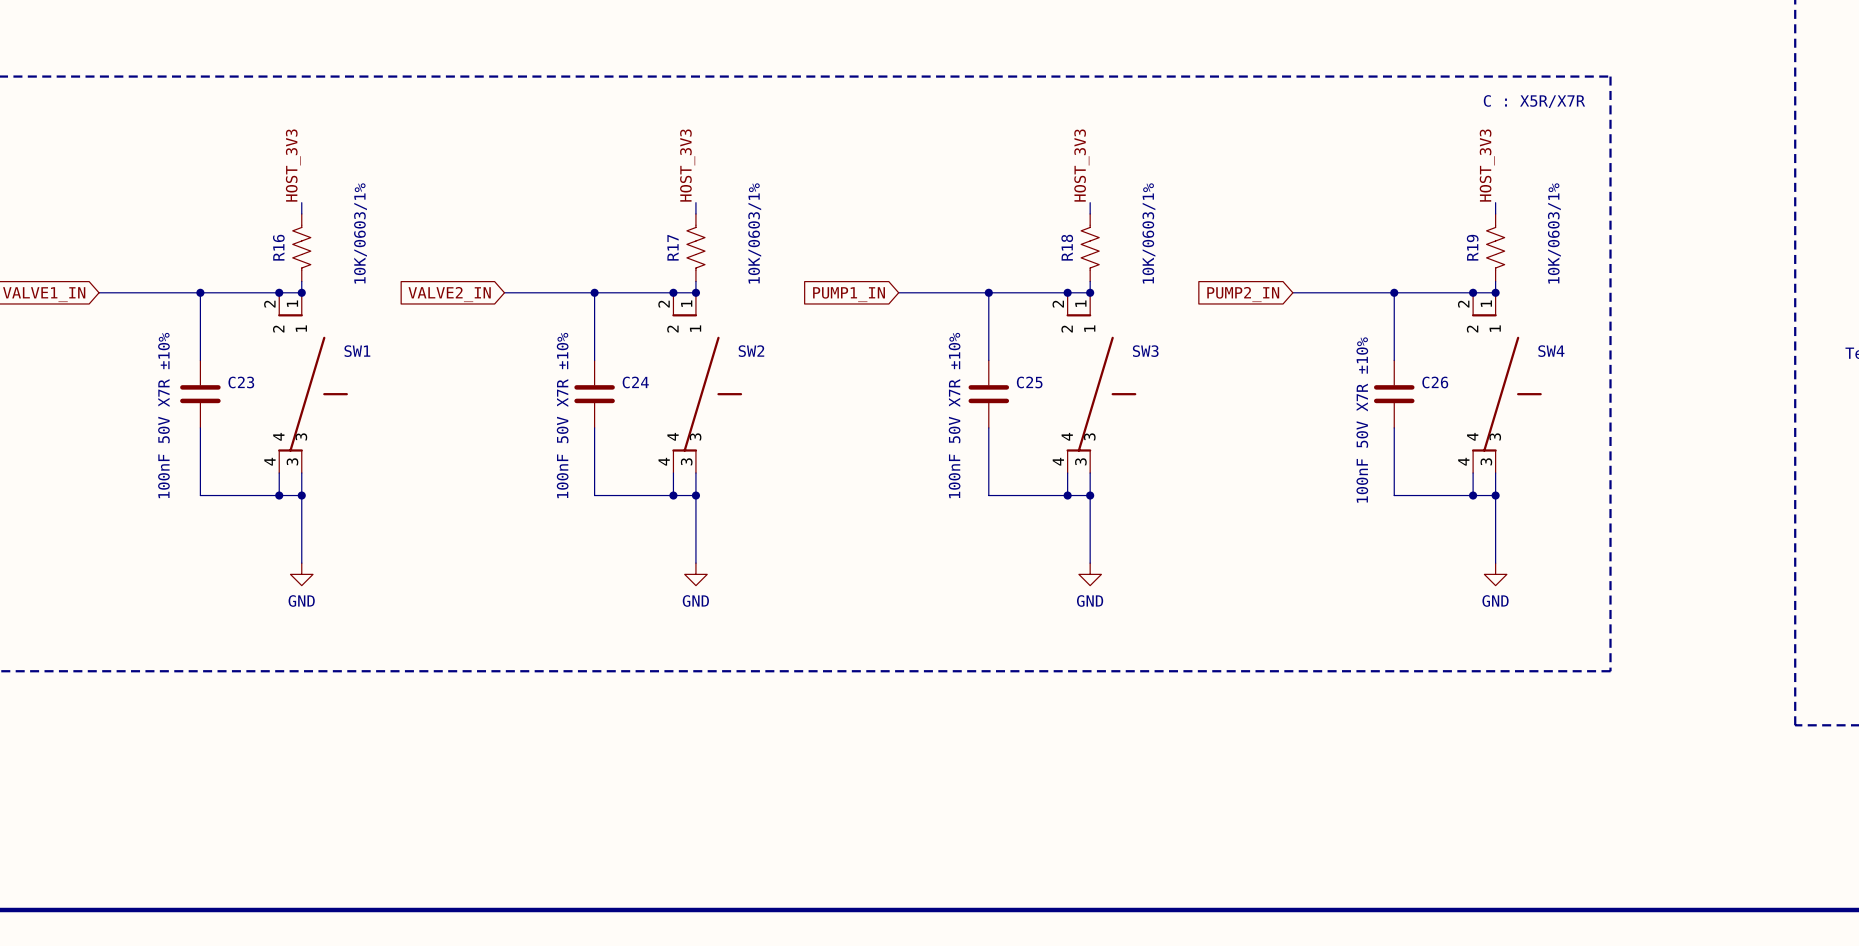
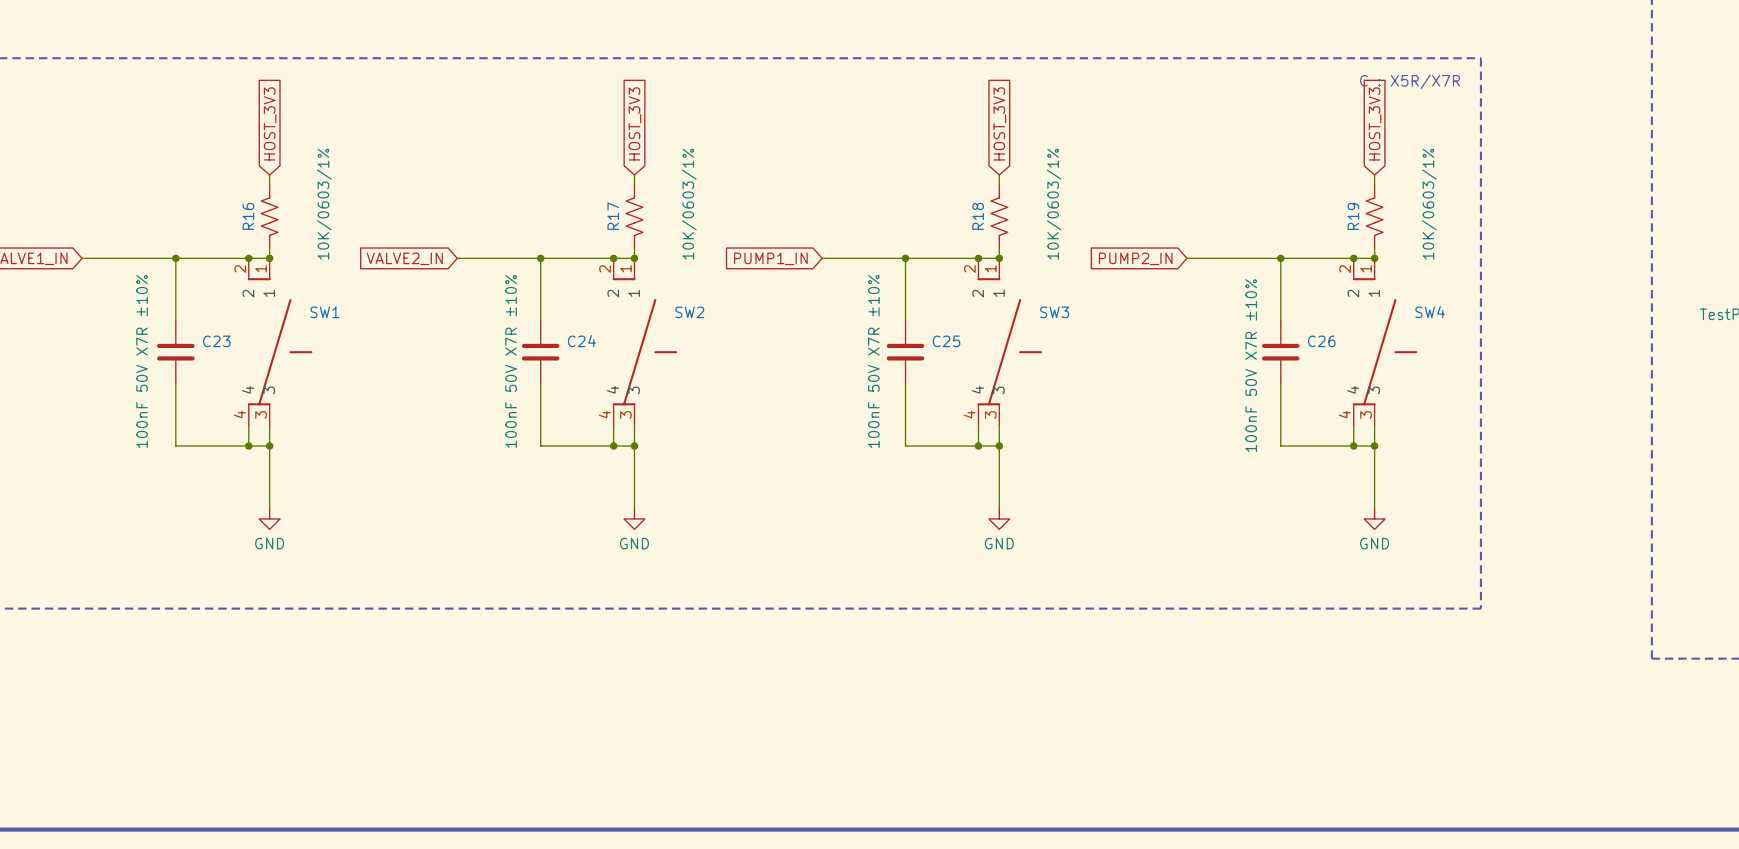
global label: none -> HOST_3V3 (270, 123)
global label: none -> HOST_3V3 (634, 123)
global label: none -> HOST_3V3 (999, 123)
global label: none -> HOST_3V3 (1375, 123)
label: HOST_3V3 (293, 165) -> none
label: HOST_3V3 (687, 165) -> none
label: HOST_3V3 (1081, 165) -> none
label: HOST_3V3 (1487, 165) -> none

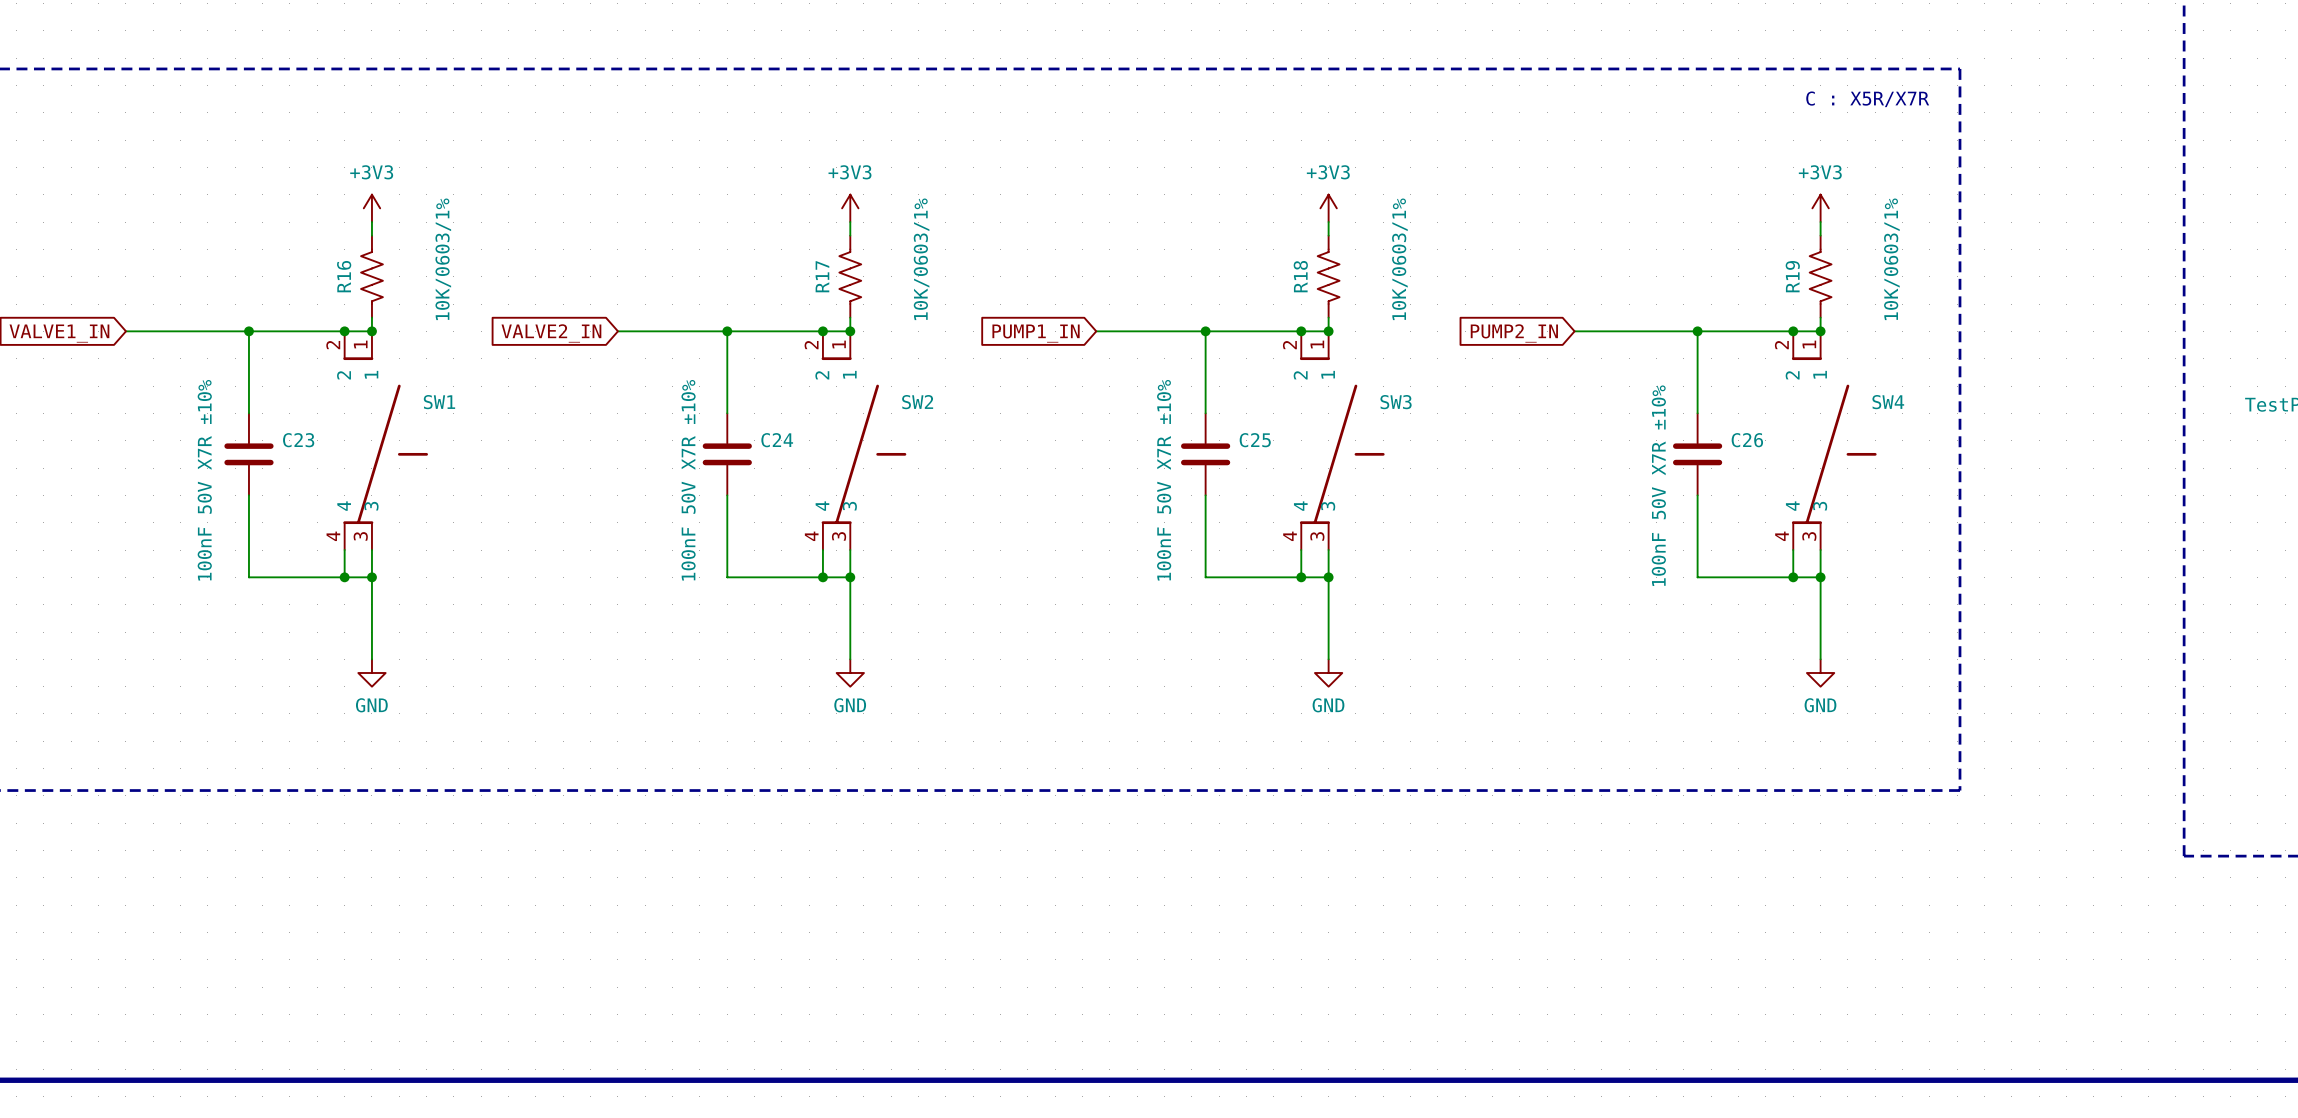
global label: HOST_3V3 (270, 123) -> none
global label: HOST_3V3 (634, 123) -> none
global label: HOST_3V3 (999, 123) -> none
global label: HOST_3V3 (1375, 123) -> none
power symbol: none -> +3V3 (371, 208)
power symbol: none -> +3V3 (850, 208)
power symbol: none -> +3V3 (1328, 208)
power symbol: none -> +3V3 (1820, 208)

